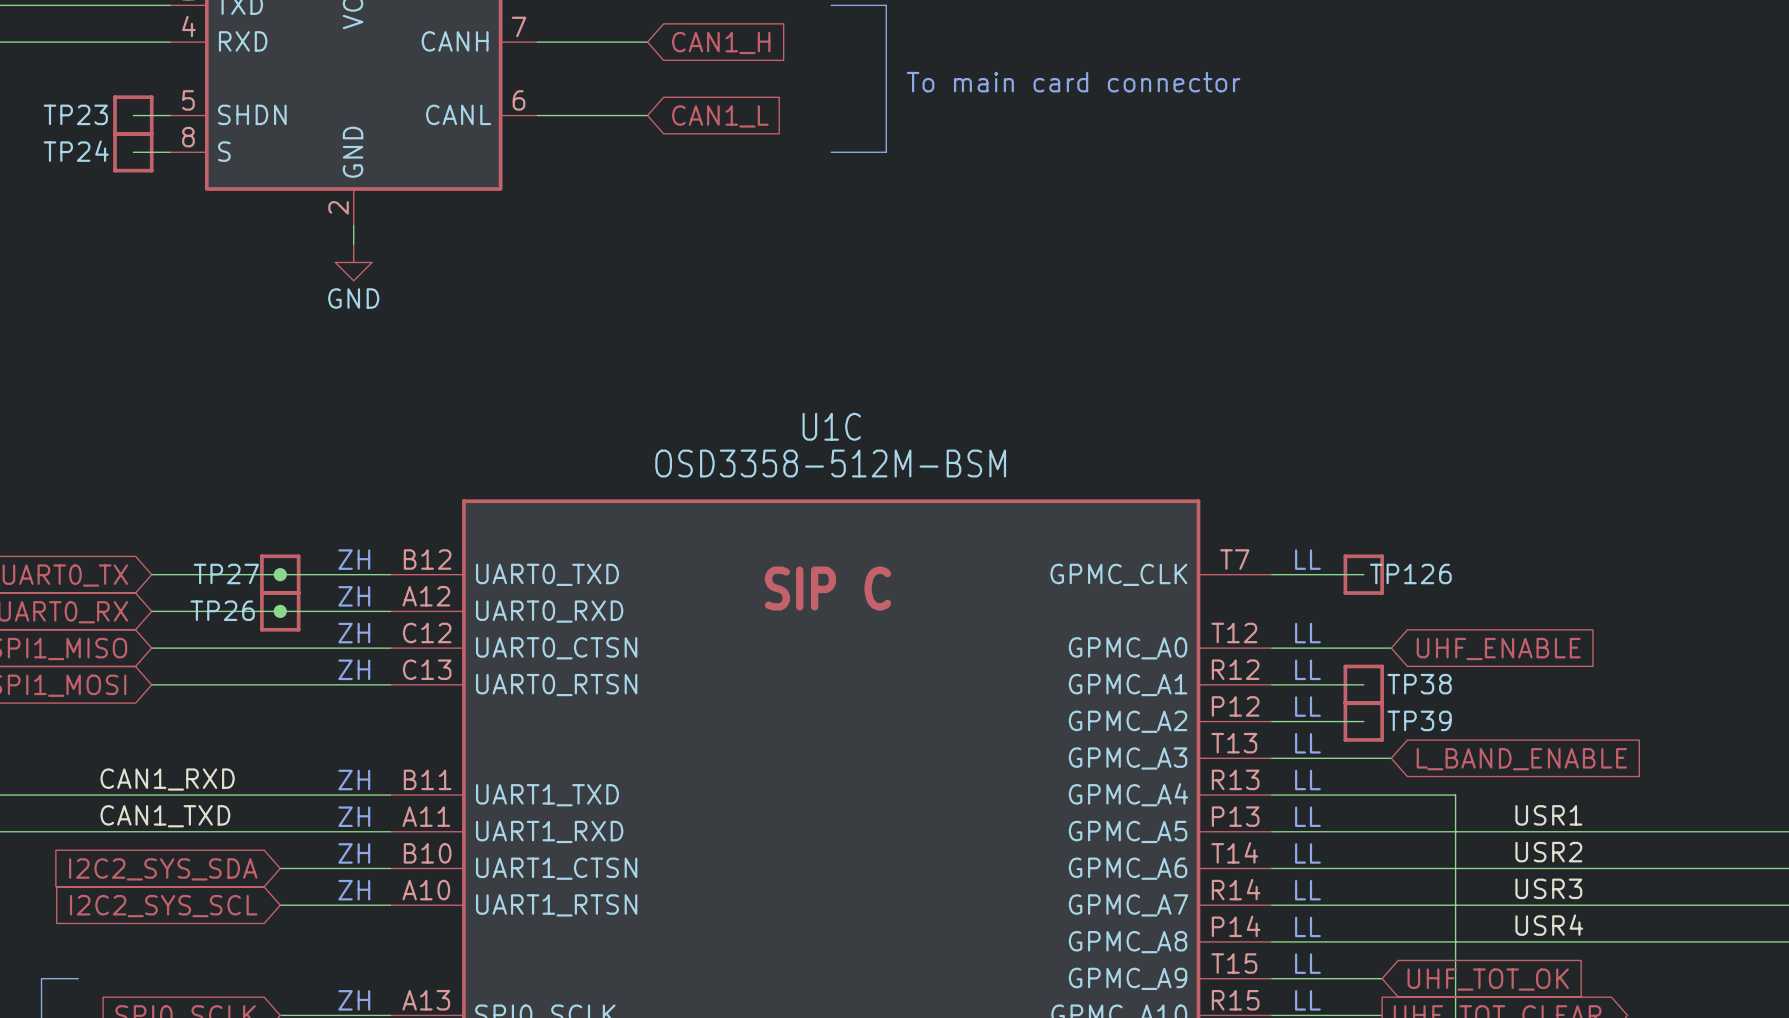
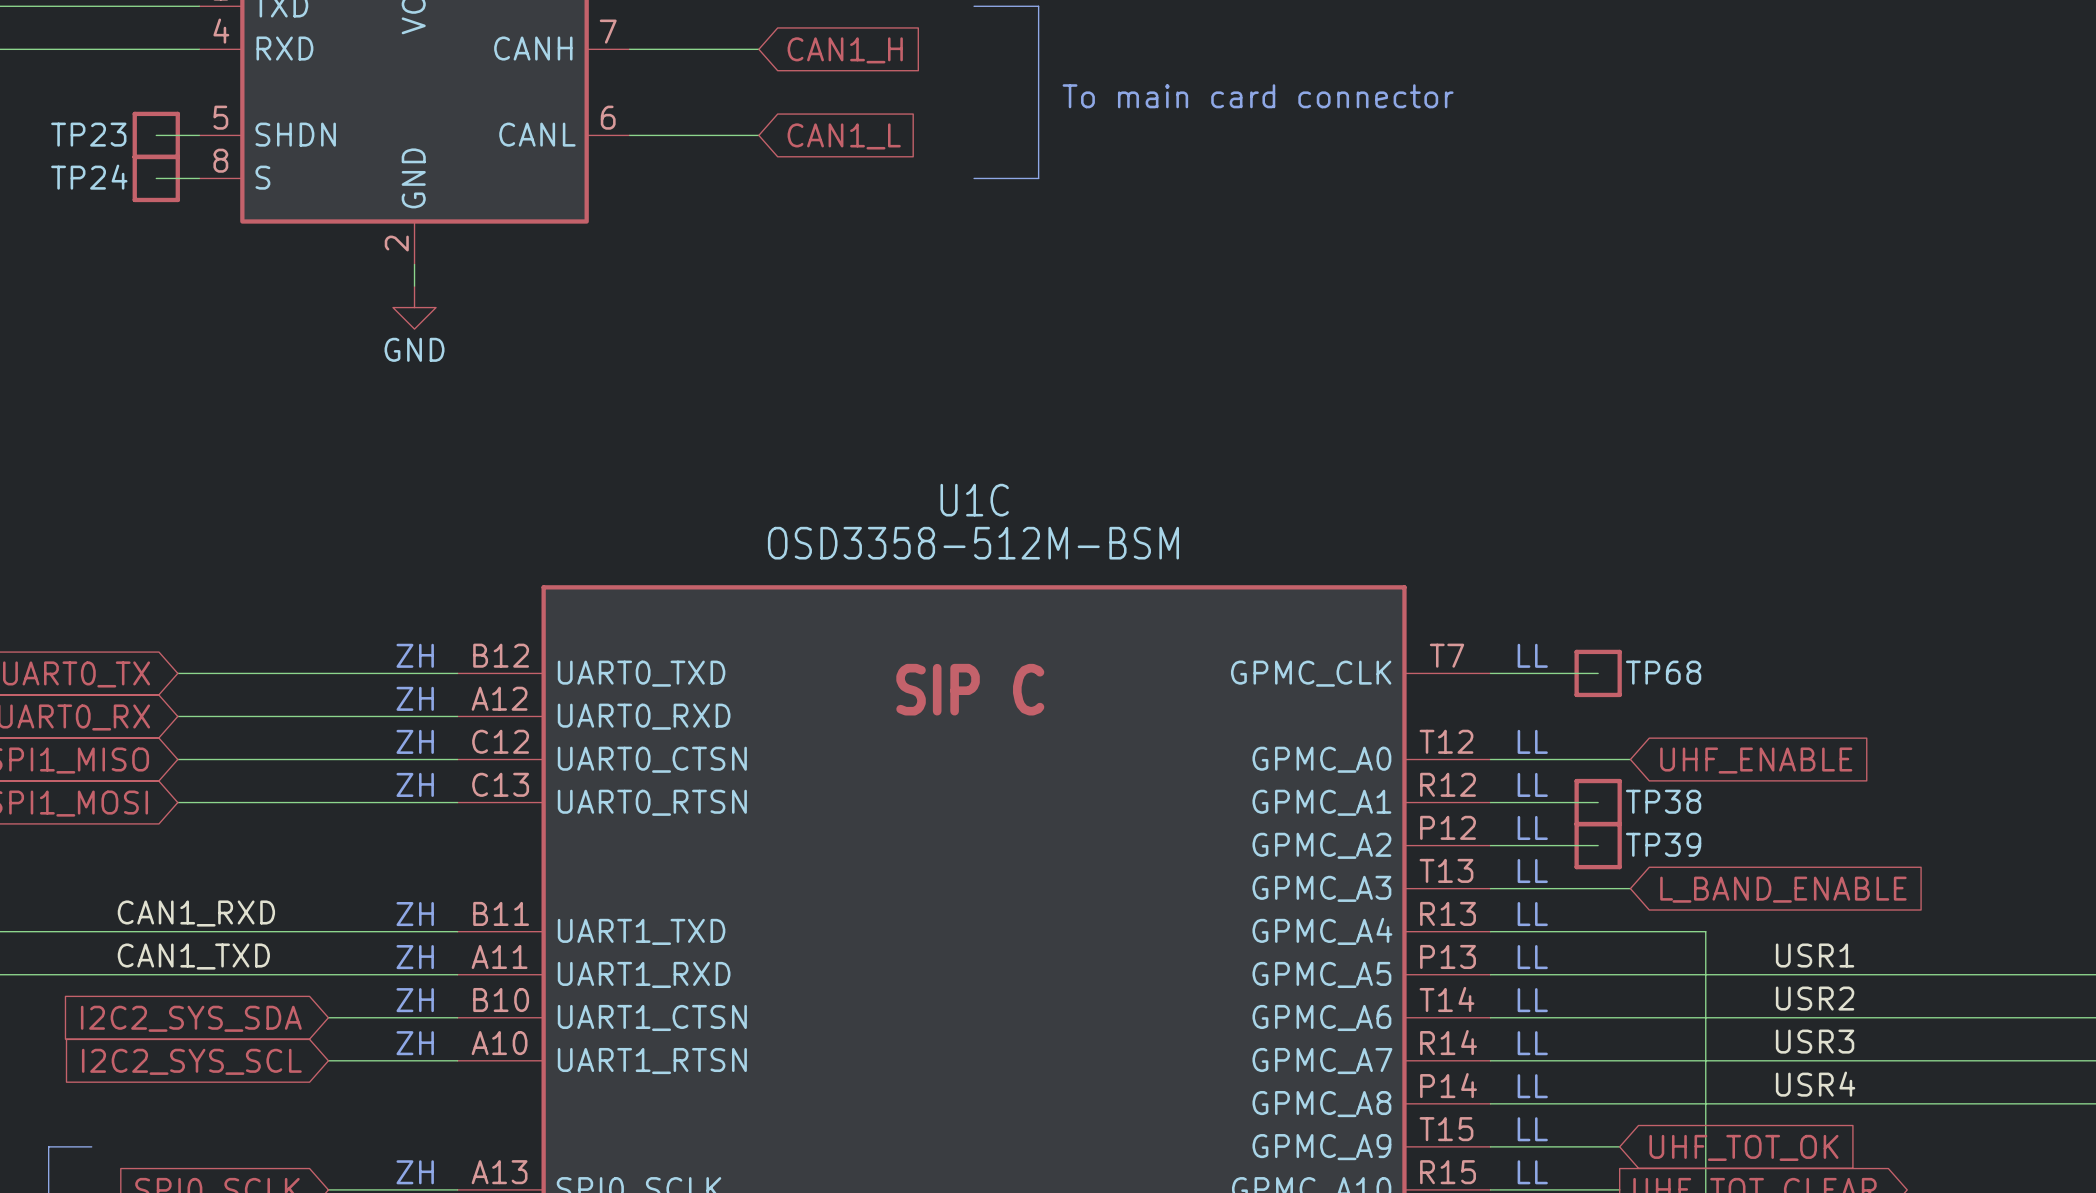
TP126 name: TP126 (1410, 573) -> TP68 (1663, 672)
junction: (280, 574) -> none
TP27: (280, 574) -> none
junction: (280, 611) -> none
TP26: (280, 611) -> none

